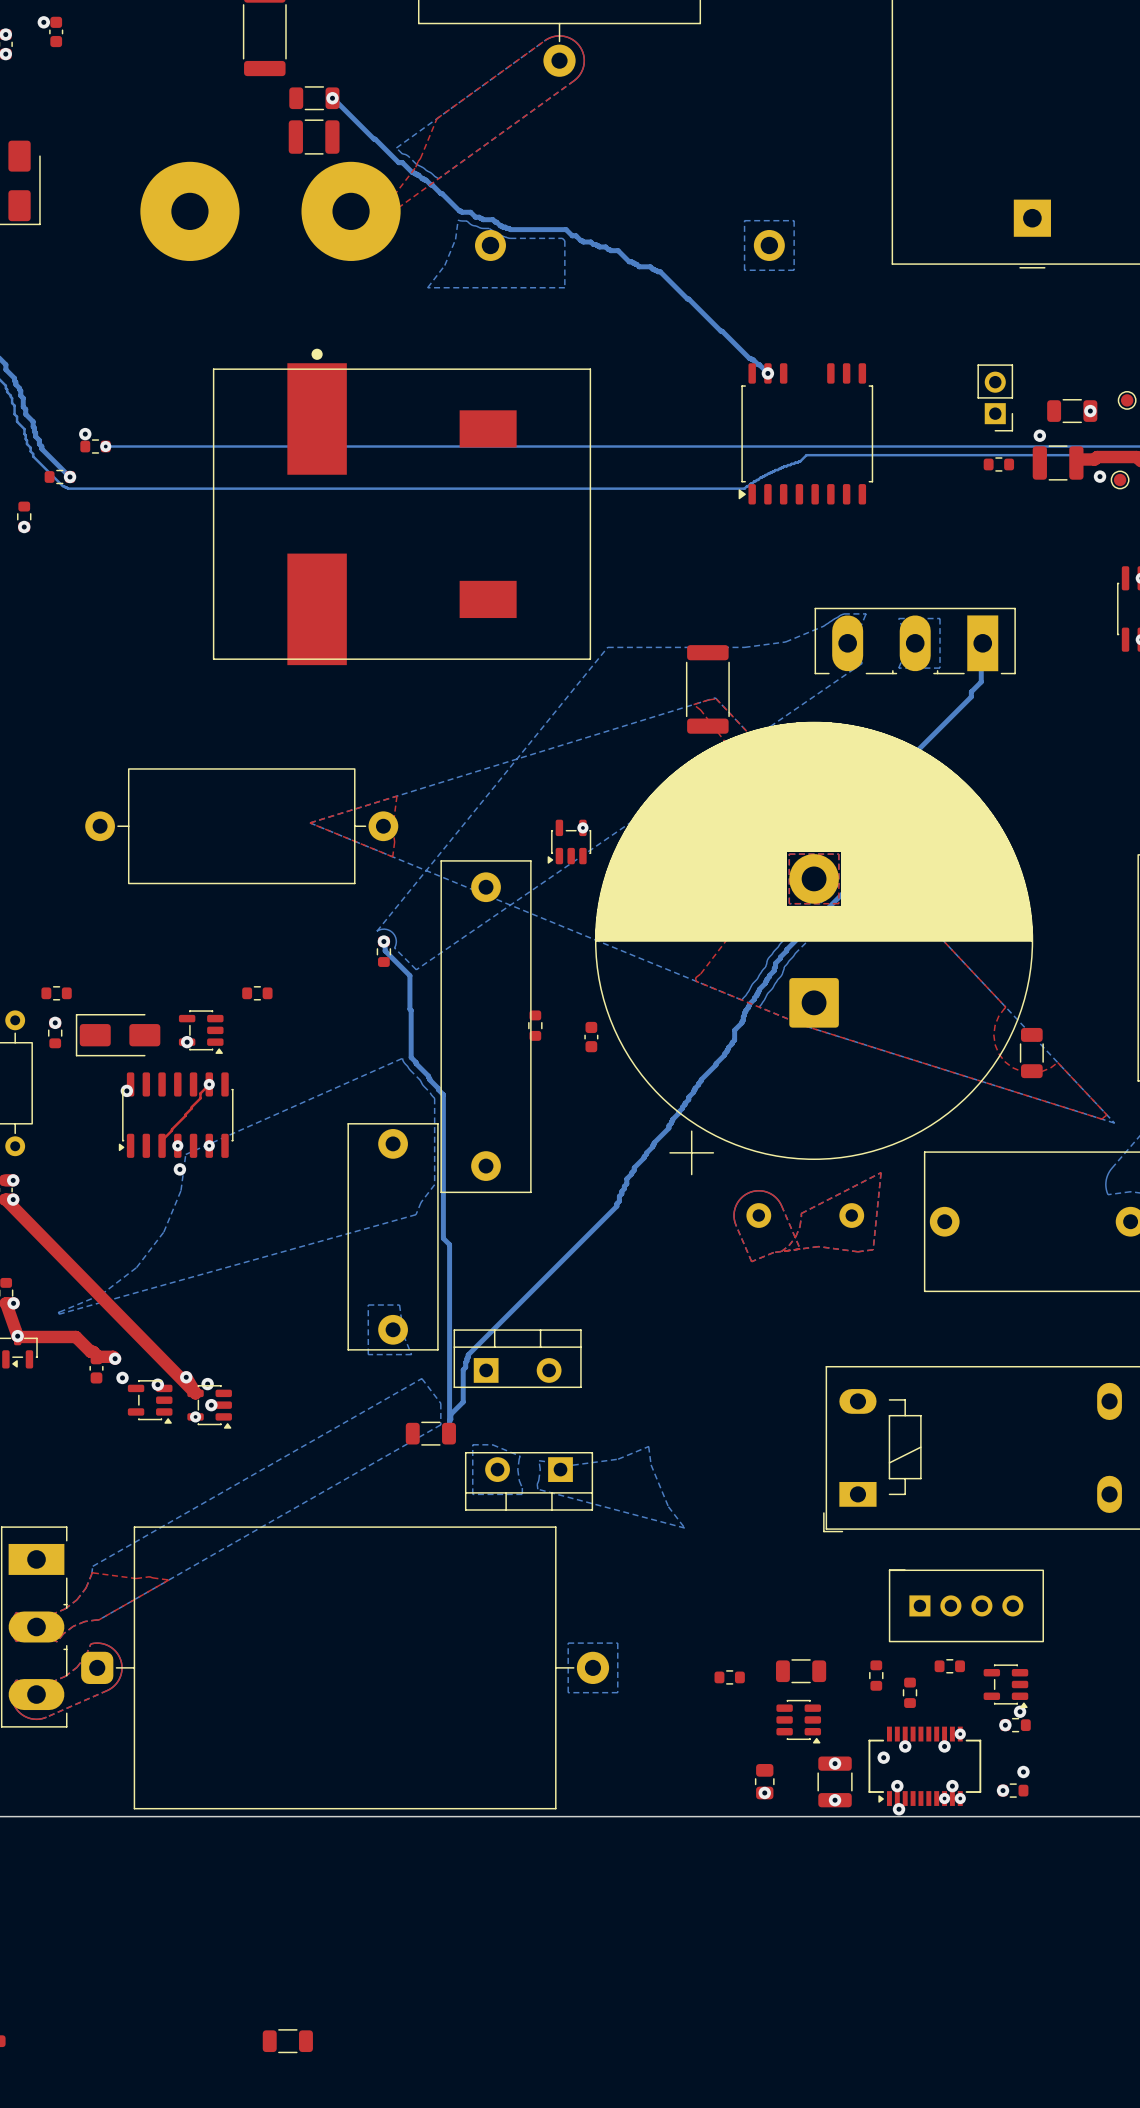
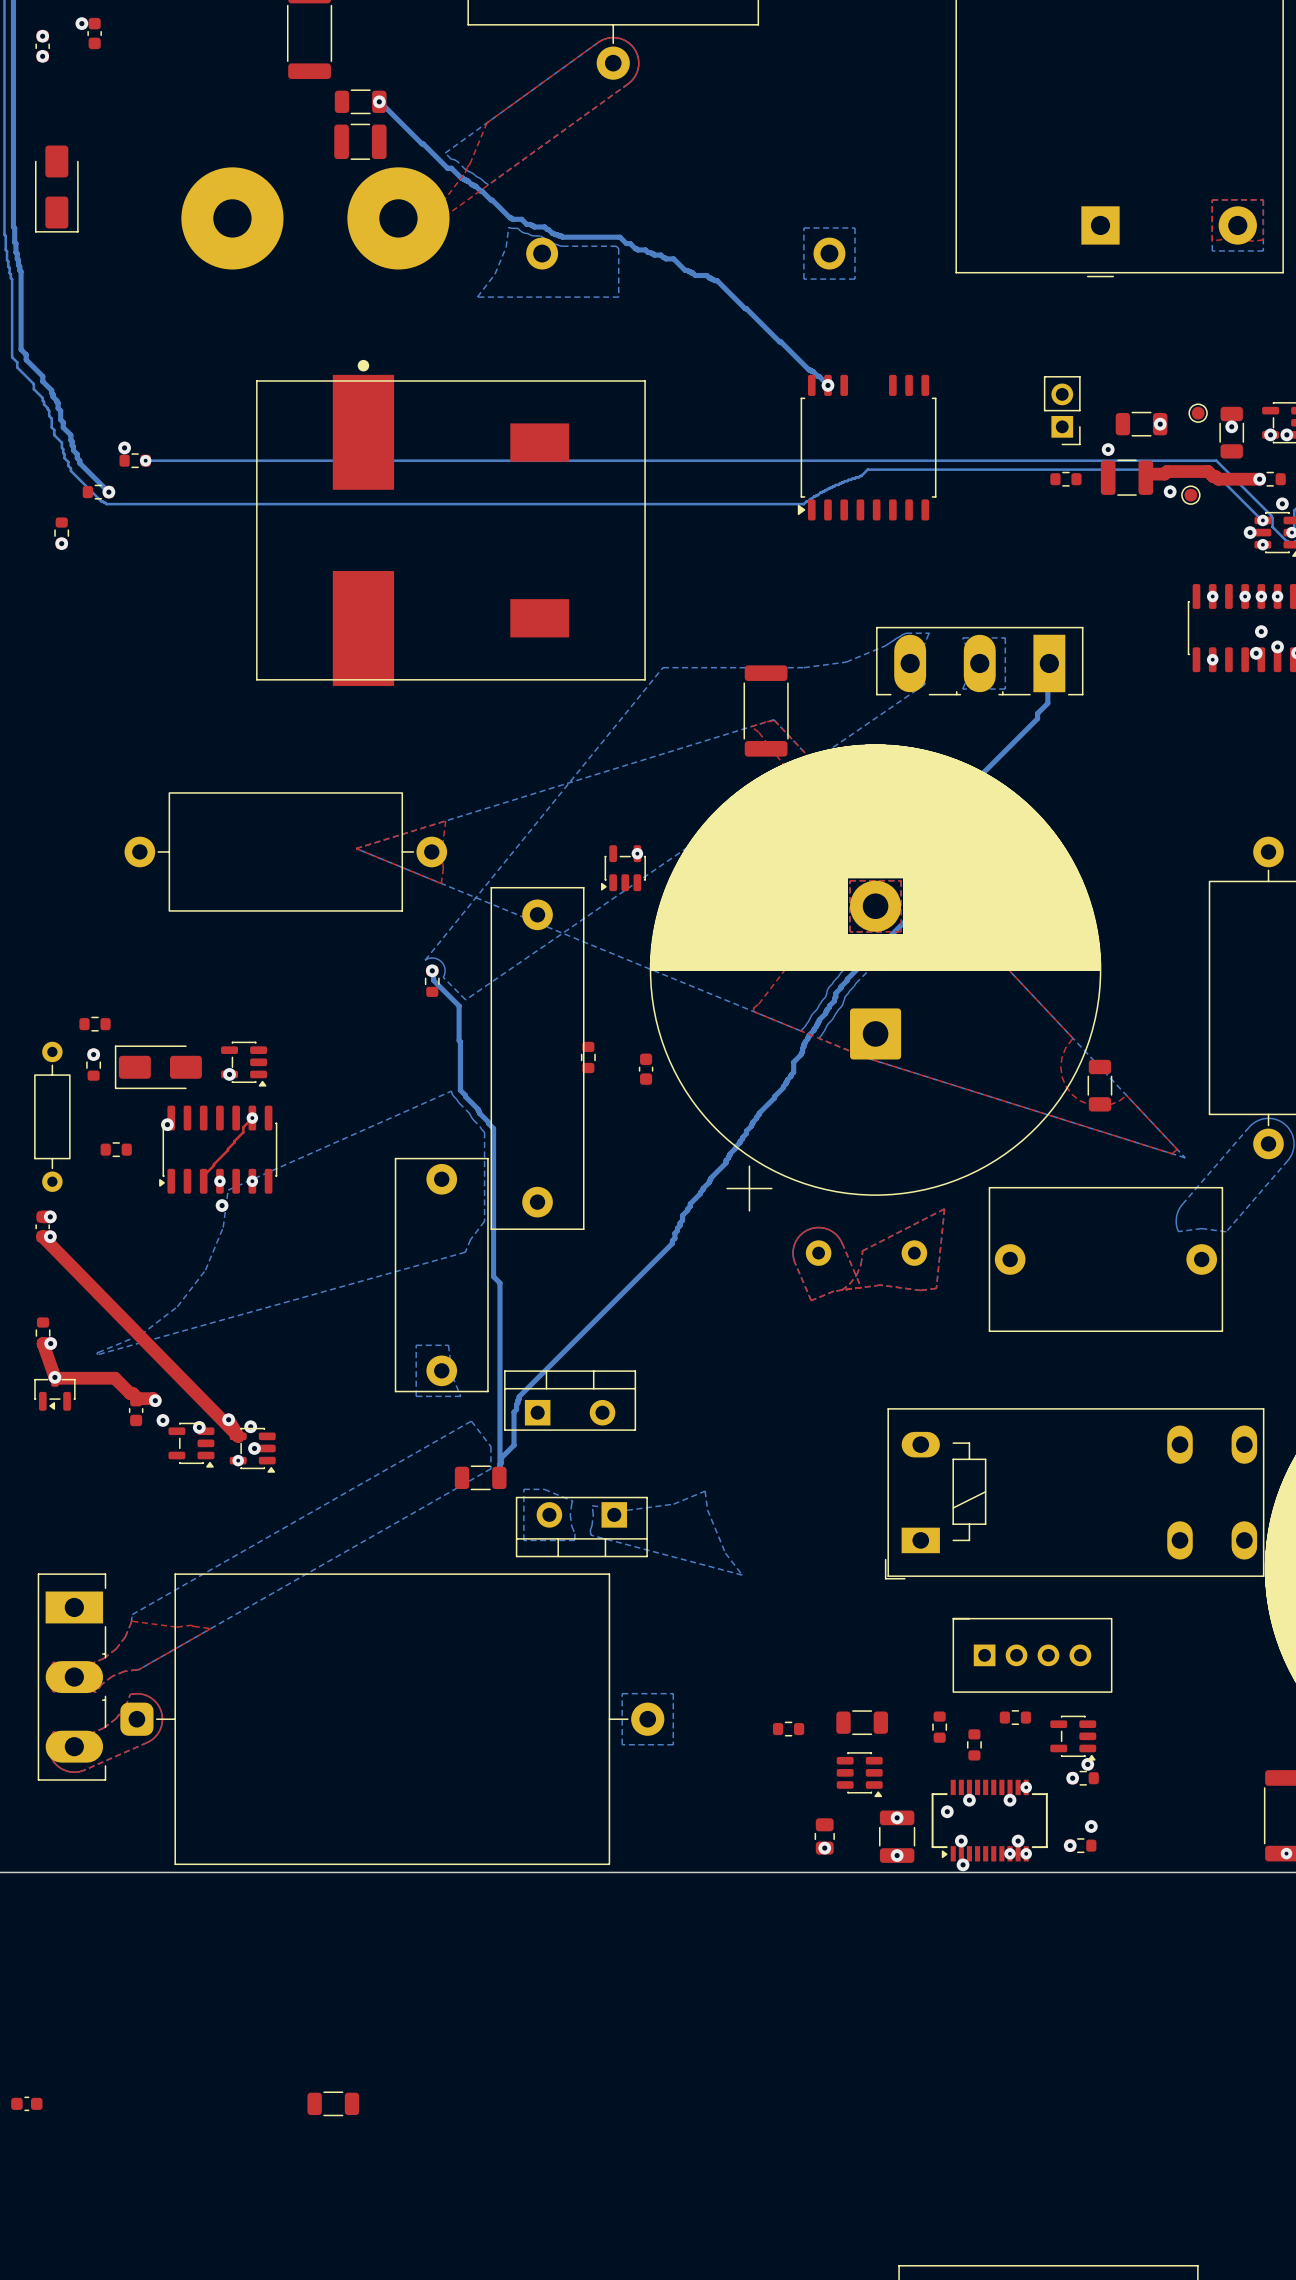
part position: (257, 993) -> (116, 1149)

